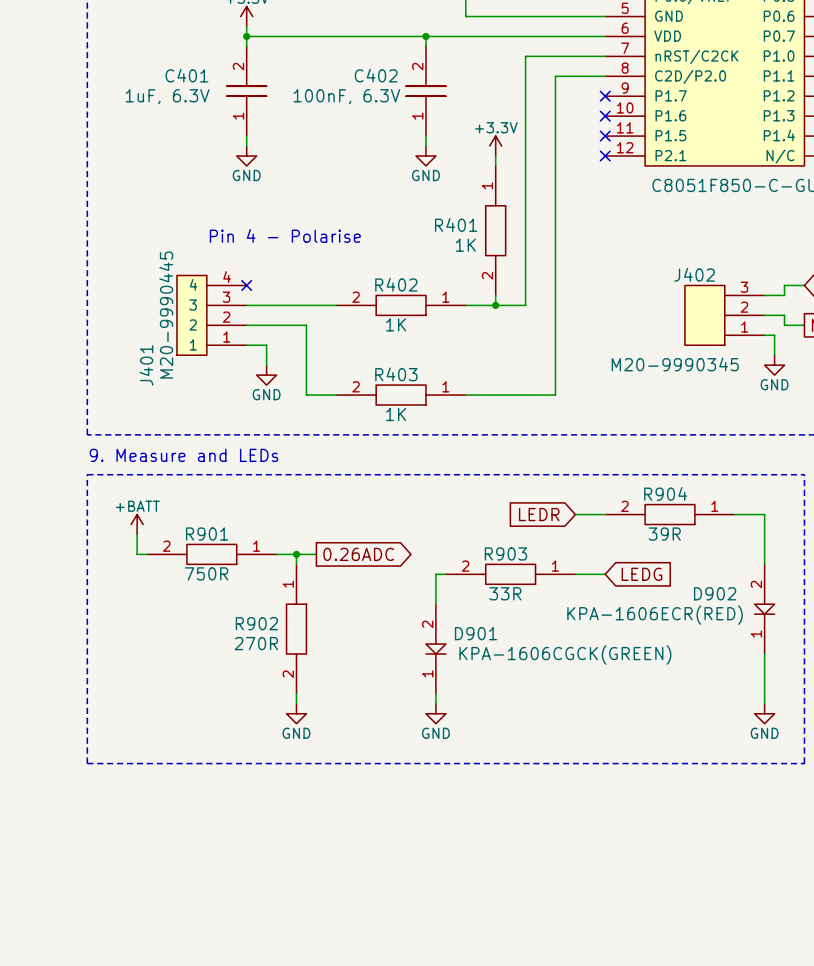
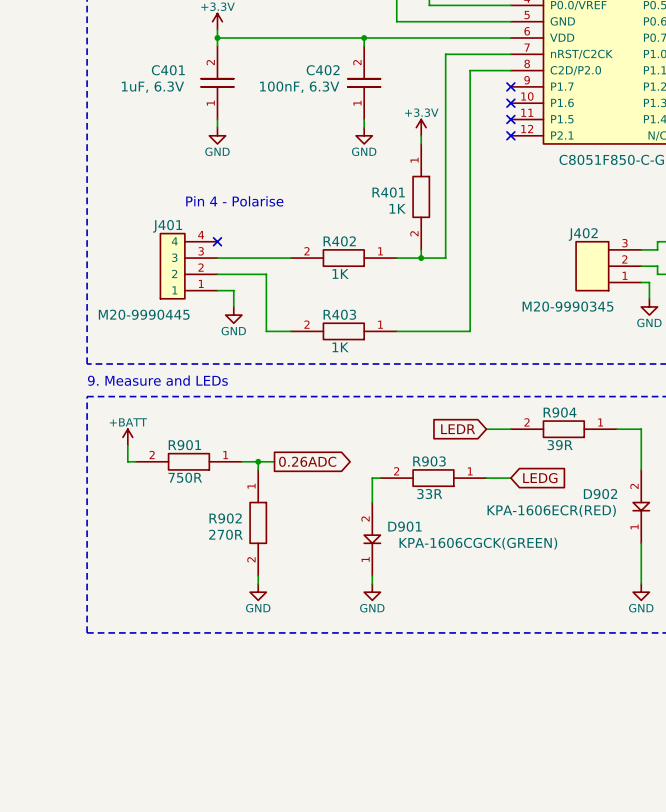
J401 value rotation: 0° (166, 315) -> 90° clockwise (144, 314)
J401 name rotation: 0° (146, 365) -> 90° clockwise (167, 226)
J401 name position: J401 (146, 365) -> J401 (167, 226)

